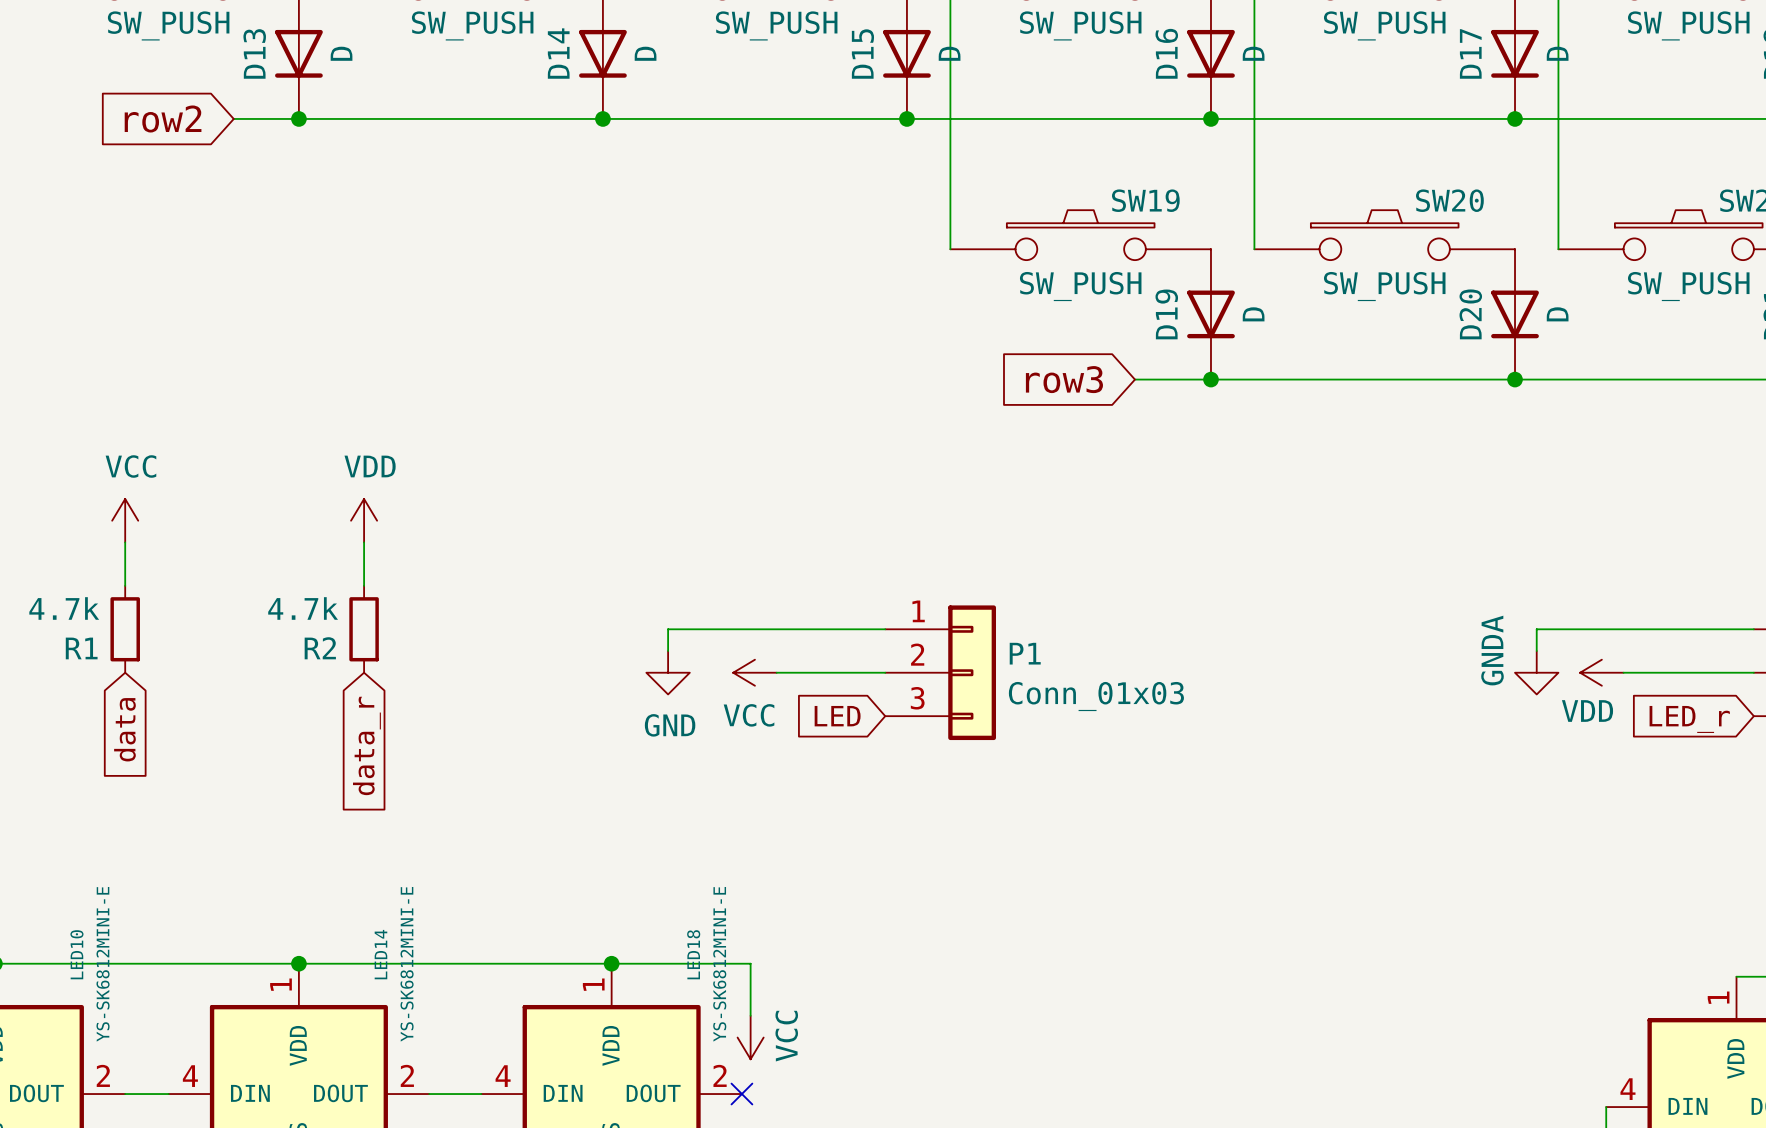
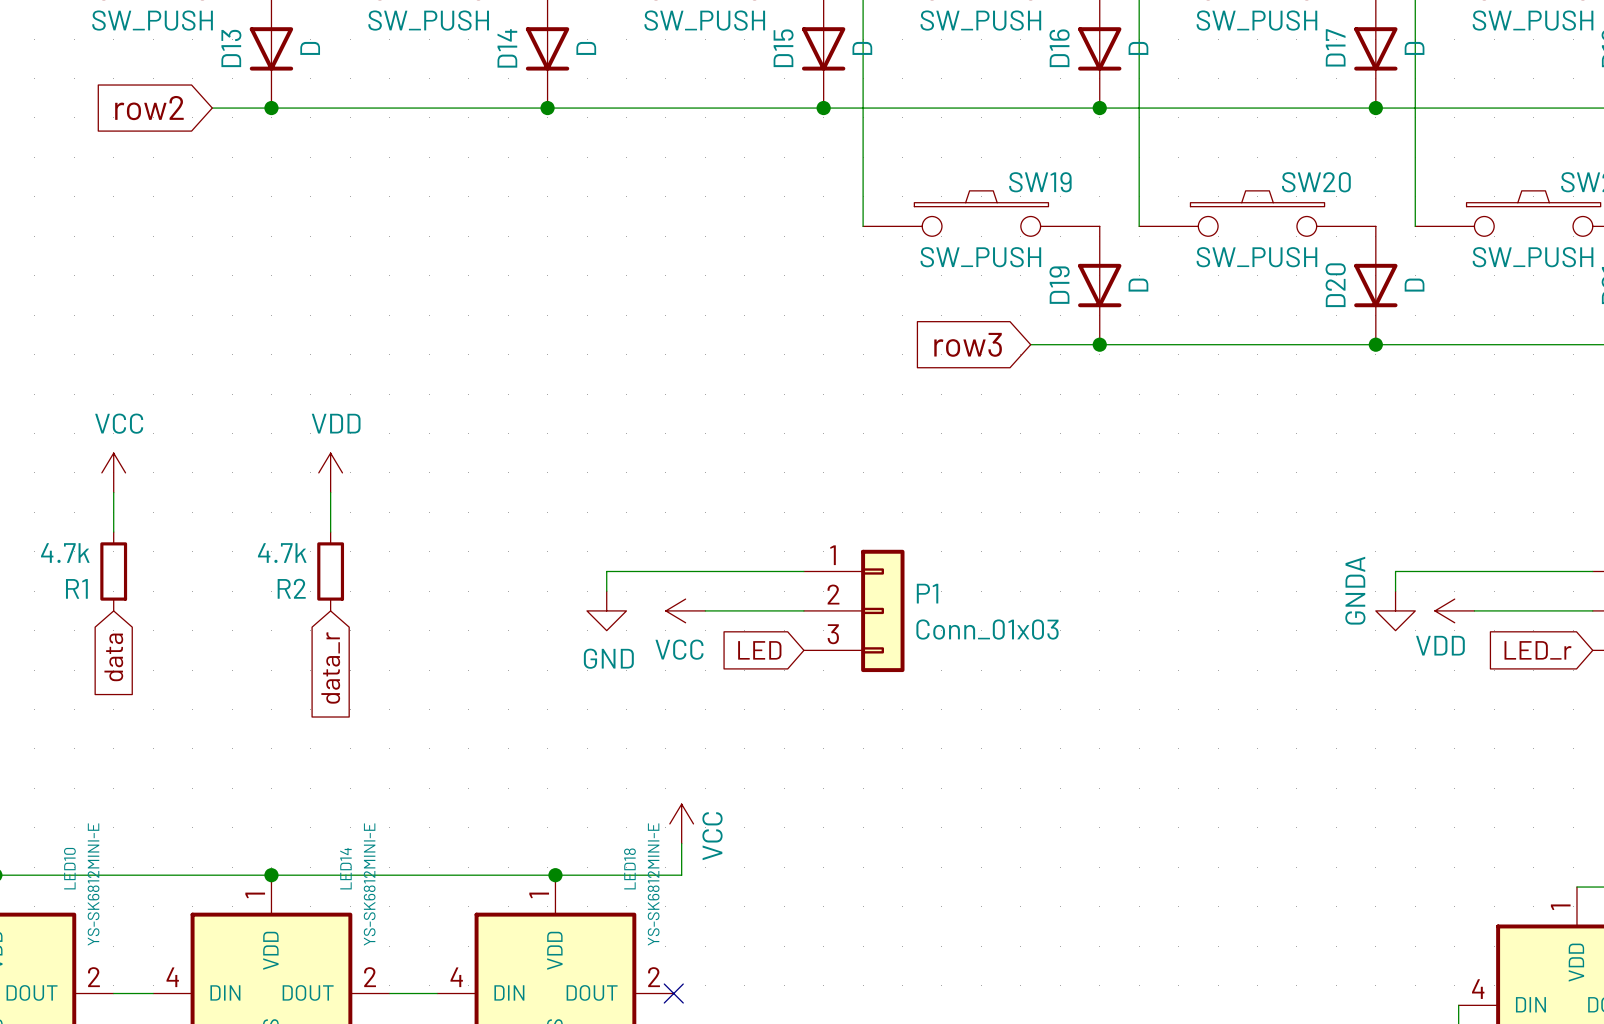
wire: (750, 963) (750, 1015) -> (681, 875) (681, 843)
power symbol rotation: 0° (750, 1037) -> 180° (681, 823)
power symbol position: VCC (750, 1037) -> VCC (681, 823)

